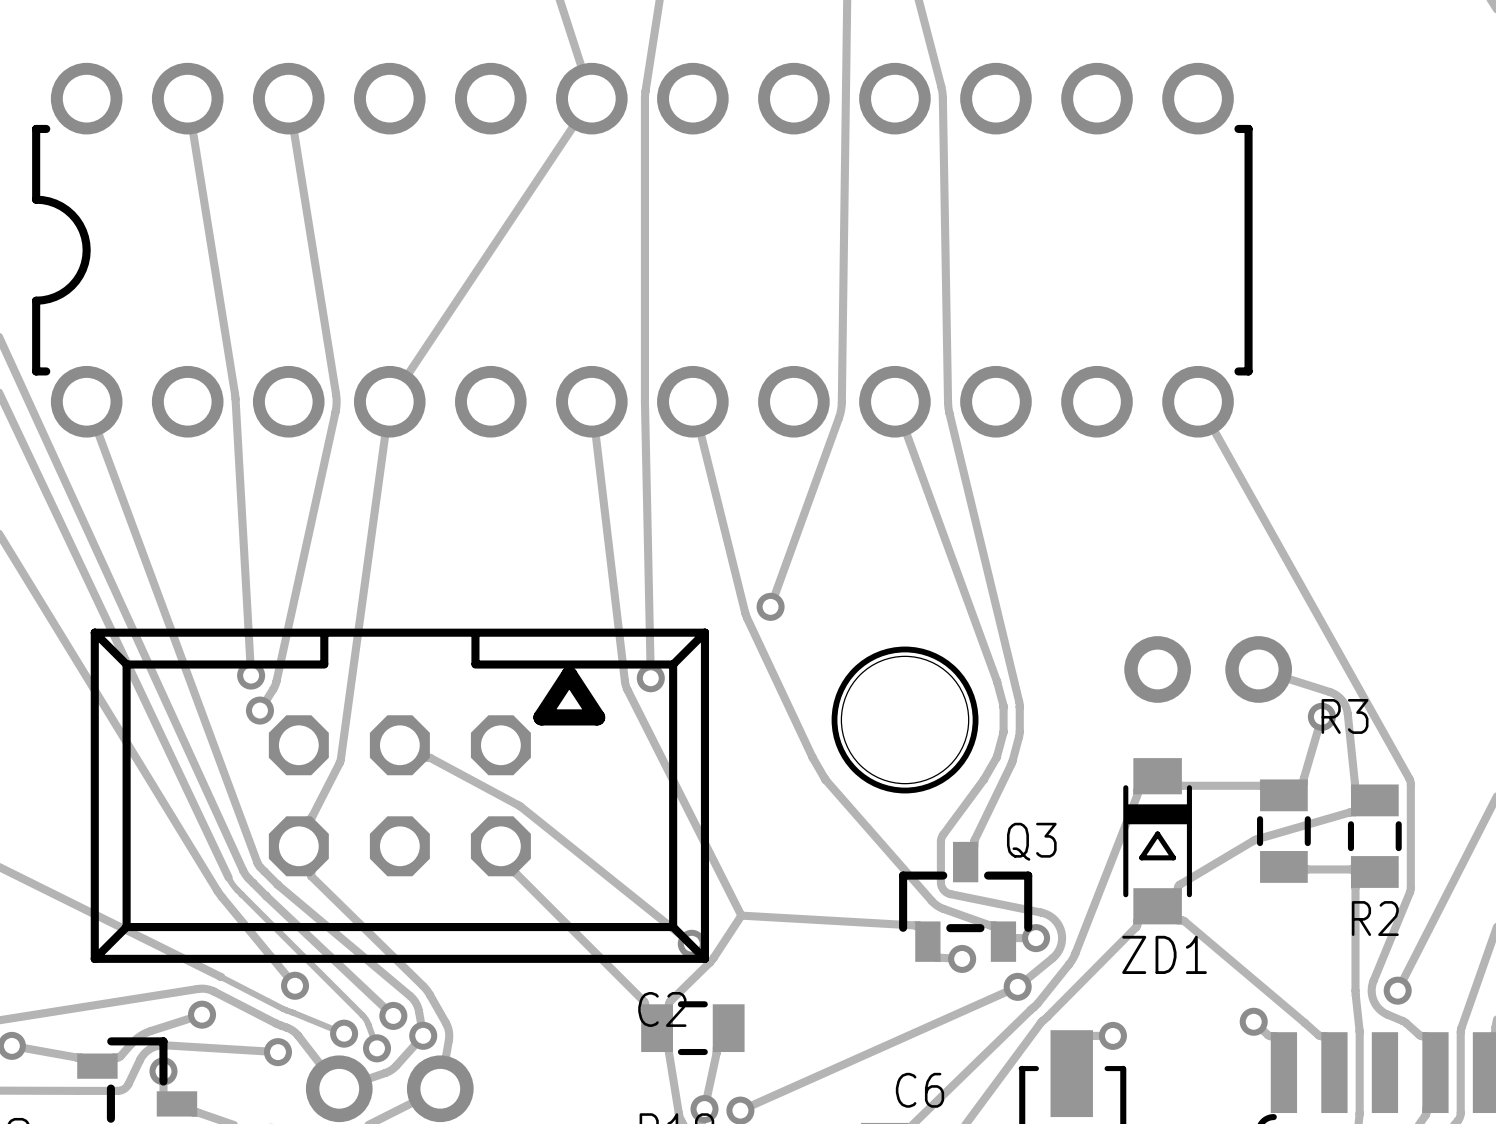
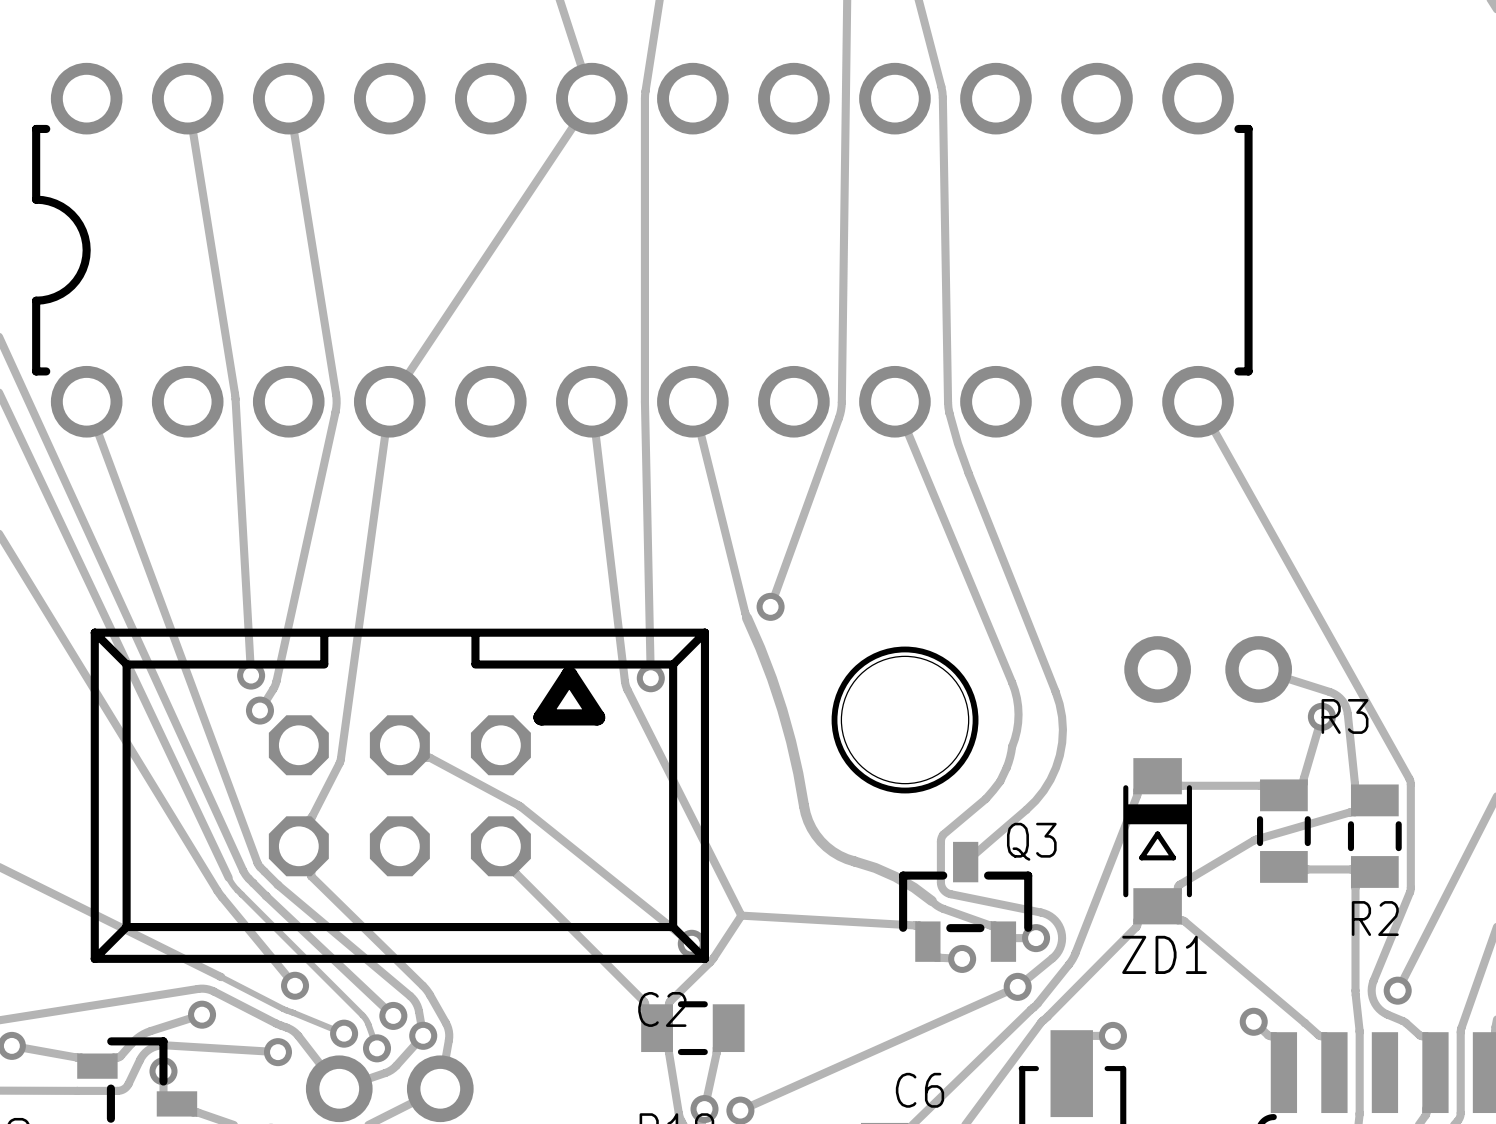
track: (894, 401) (996, 681) -> (894, 401) (1012, 682) (1018, 706) (1016, 730) (1008, 762) (1000, 781) (985, 798) (943, 834)
track: (949, 413) (1019, 706) (1019, 734) (1012, 762) (965, 862) -> (949, 413) (968, 473) (1055, 691) (1062, 716) (1062, 729) (1059, 755) (1050, 779) (1043, 790) (1026, 809) (965, 862)
track: (747, 617) (812, 757) -> none
track: (996, 681) (1003, 706) (1003, 731) (996, 756) (983, 779) (943, 834) -> none
track: (812, 757) (825, 779) (931, 900) -> (747, 617) (760, 648) (782, 709) (798, 773) (805, 813) (815, 835) (826, 846) (839, 855) (895, 876) (931, 900)

